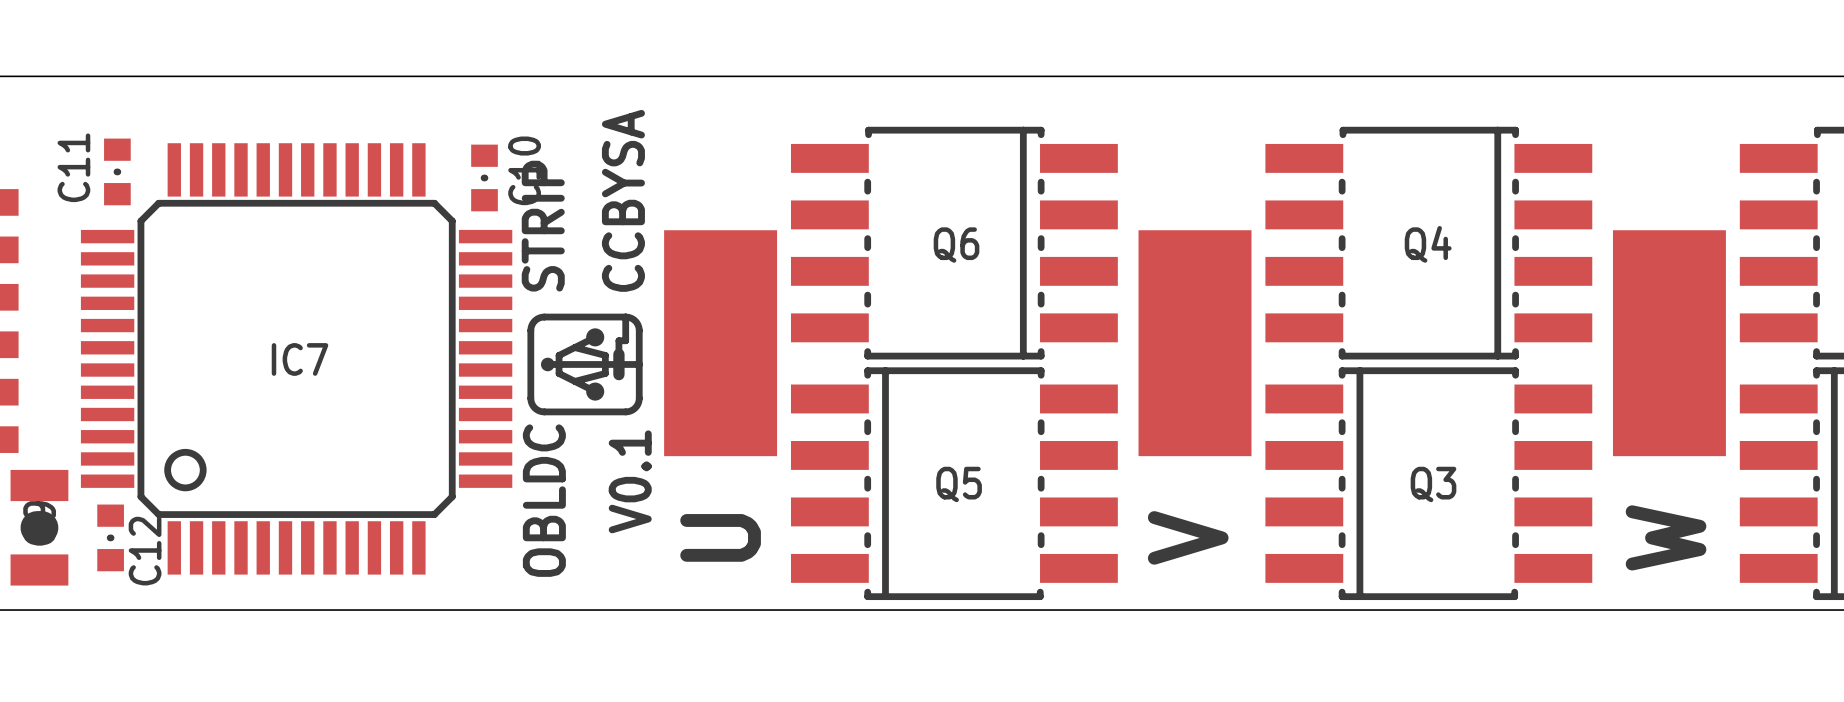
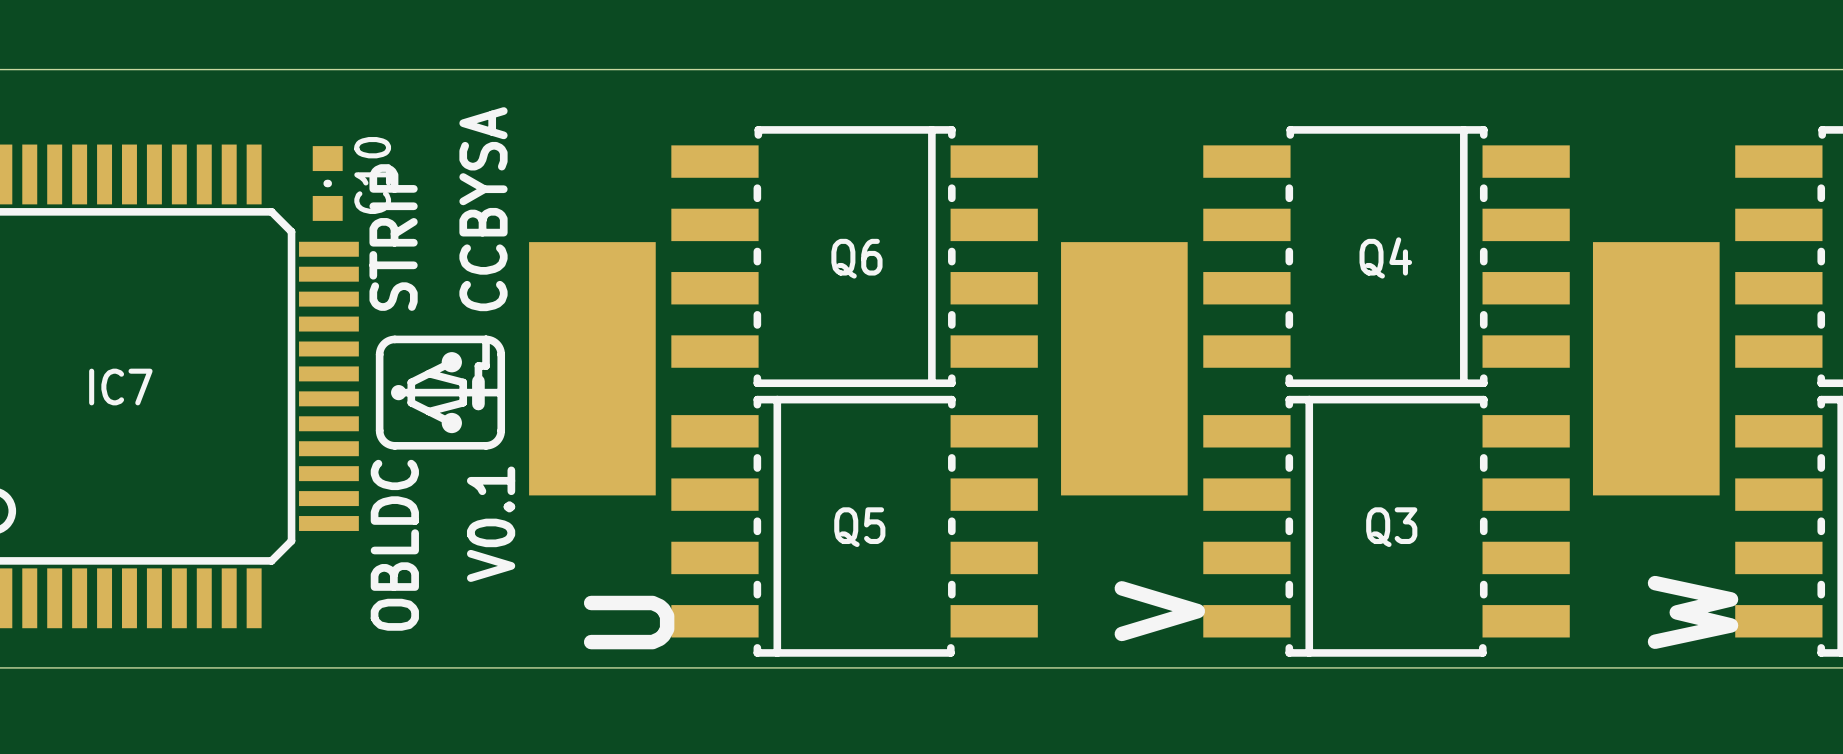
text position: U (720, 537) -> U (629, 622)
text position: V (1188, 537) -> V (1159, 611)
text position: W (1666, 537) -> W (1693, 612)

